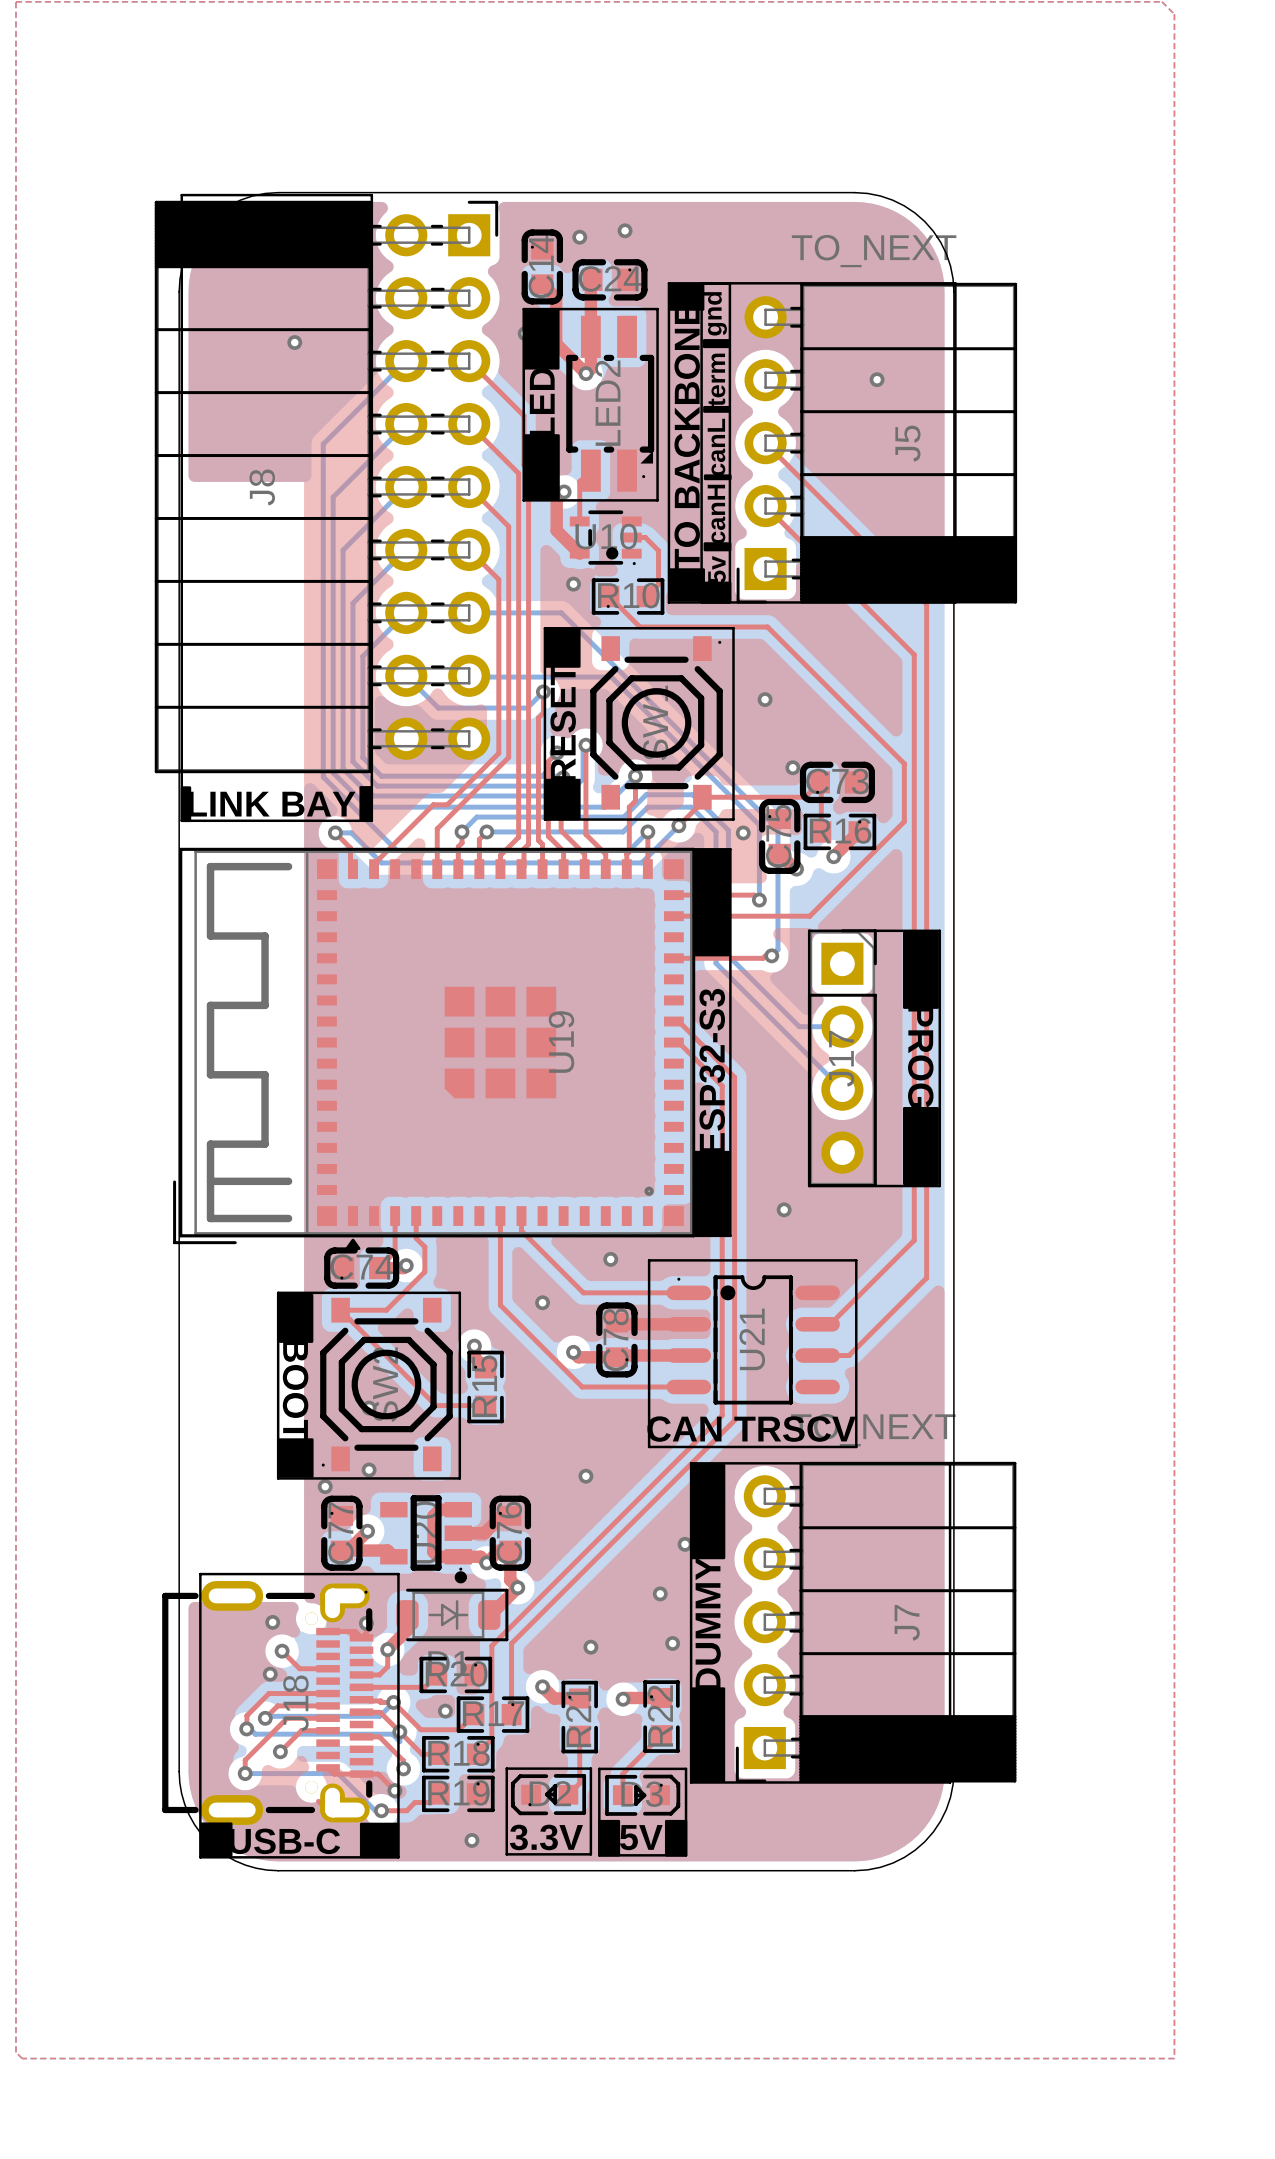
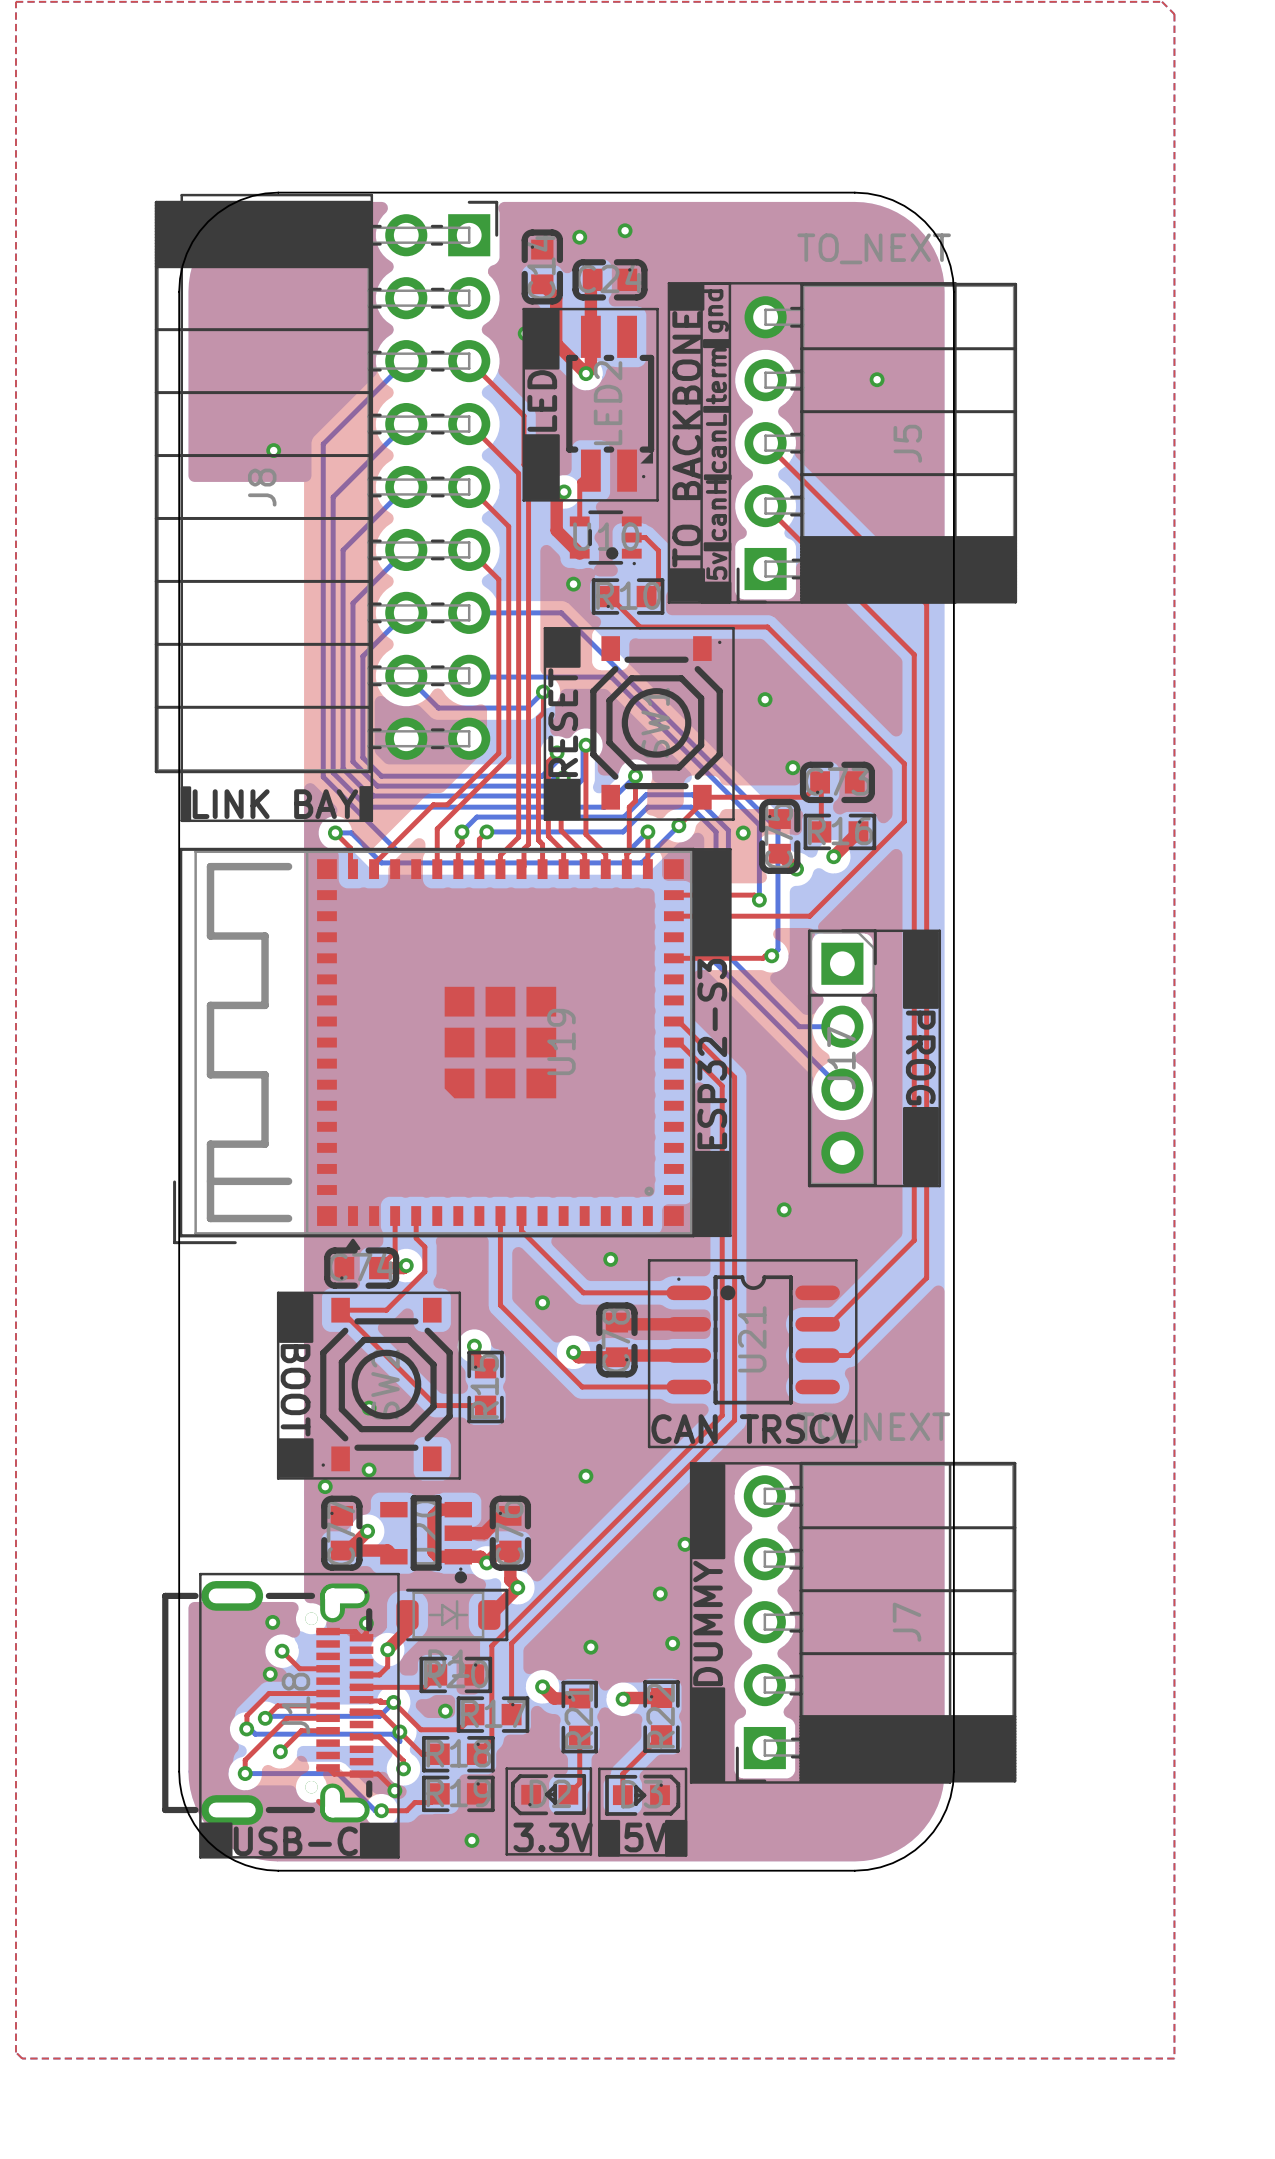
via position: (294, 342) -> (273, 450)

